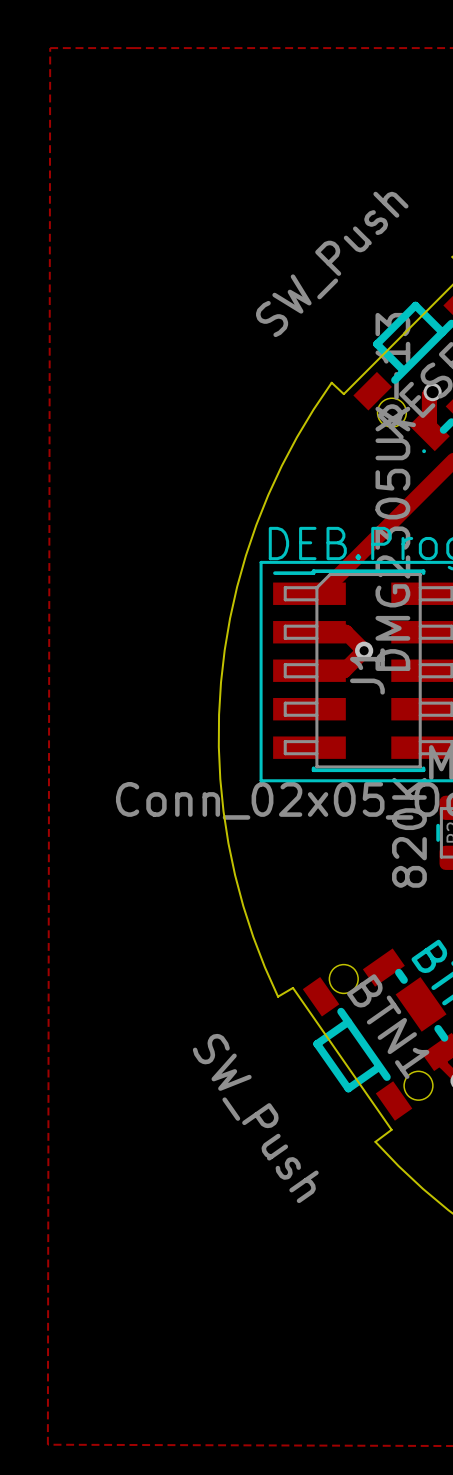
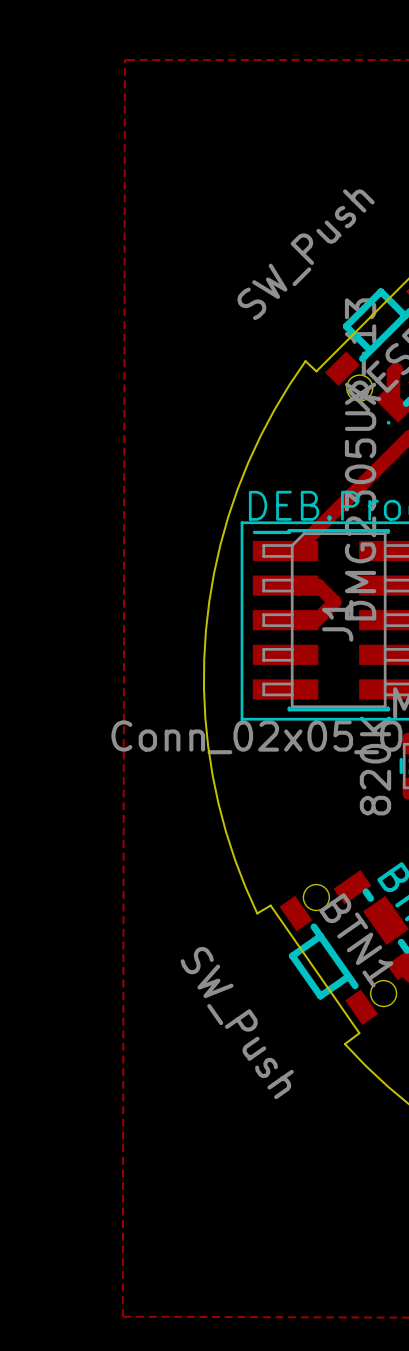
zone outline: (130, 48) (50, 48) (47, 1444) (128, 1444) -> (124, 60) (122, 1316)
via: (432, 392) -> none
via: (364, 650) -> none

